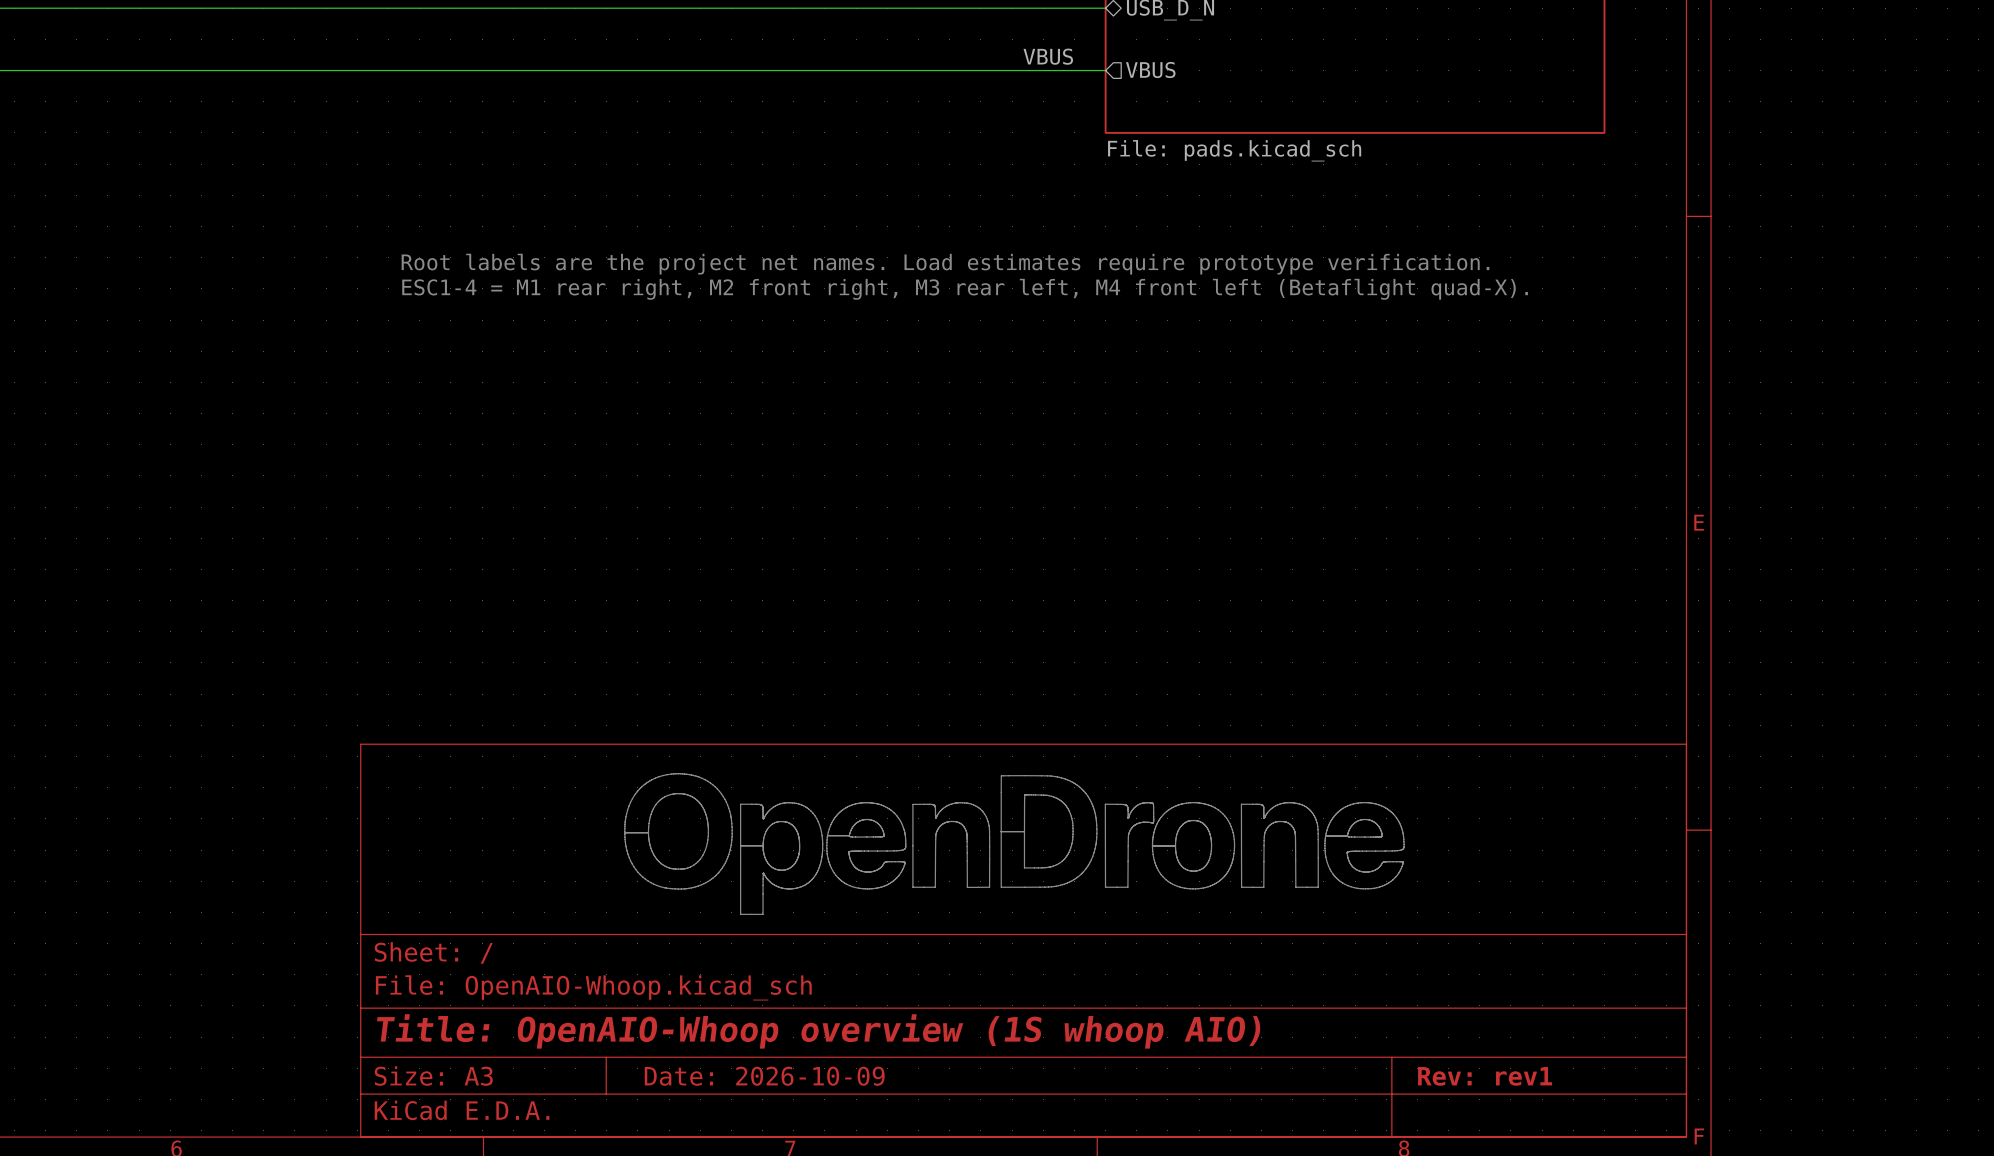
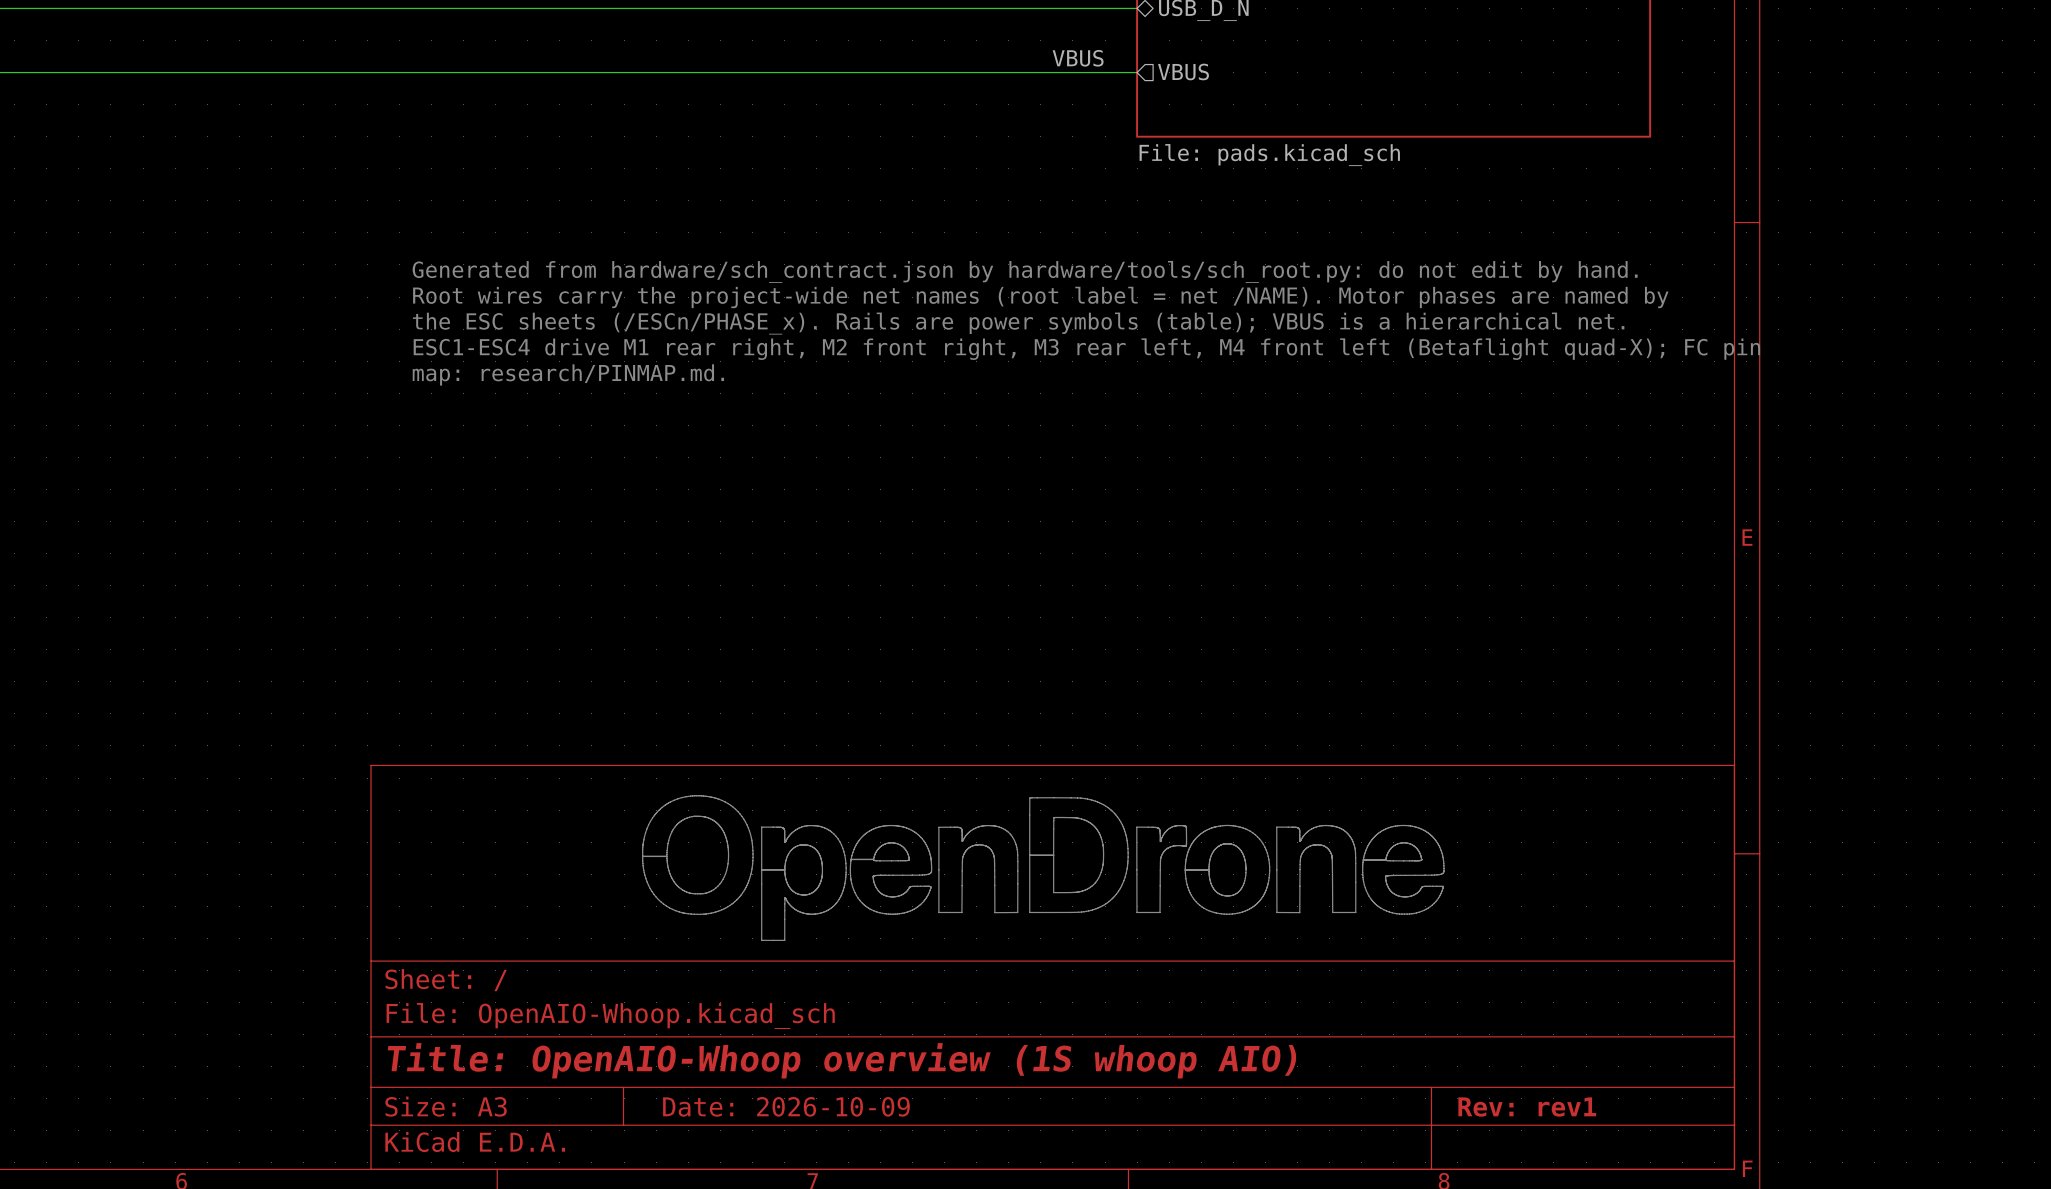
text: Root labels are the project net names. Load estimates require prototype verification. (945, 264) -> Generated from hardware/sch_contract.json by hardware/tools/sch_root.py: do not edit by hand. (1025, 271)
text: ESC1-4 = M1 rear right, M2 front right, M3 rear left, M4 front left (Betaflight quad-X). (965, 289) -> Root wires carry the project-wide net names (root label = net /NAME). Motor phases are named by (1040, 297)
text: none -> the ESC sheets (/ESCn/PHASE_x). Rails are power symbols (table); VBUS is a hierarchical net. (1018, 323)
text: none -> ESC1-ESC4 drive M1 rear right, M2 front right, M3 rear left, M4 front left (Betaflight quad-X); FC pin (1086, 349)
text: none -> map: research/PINMAP.md. (568, 374)

